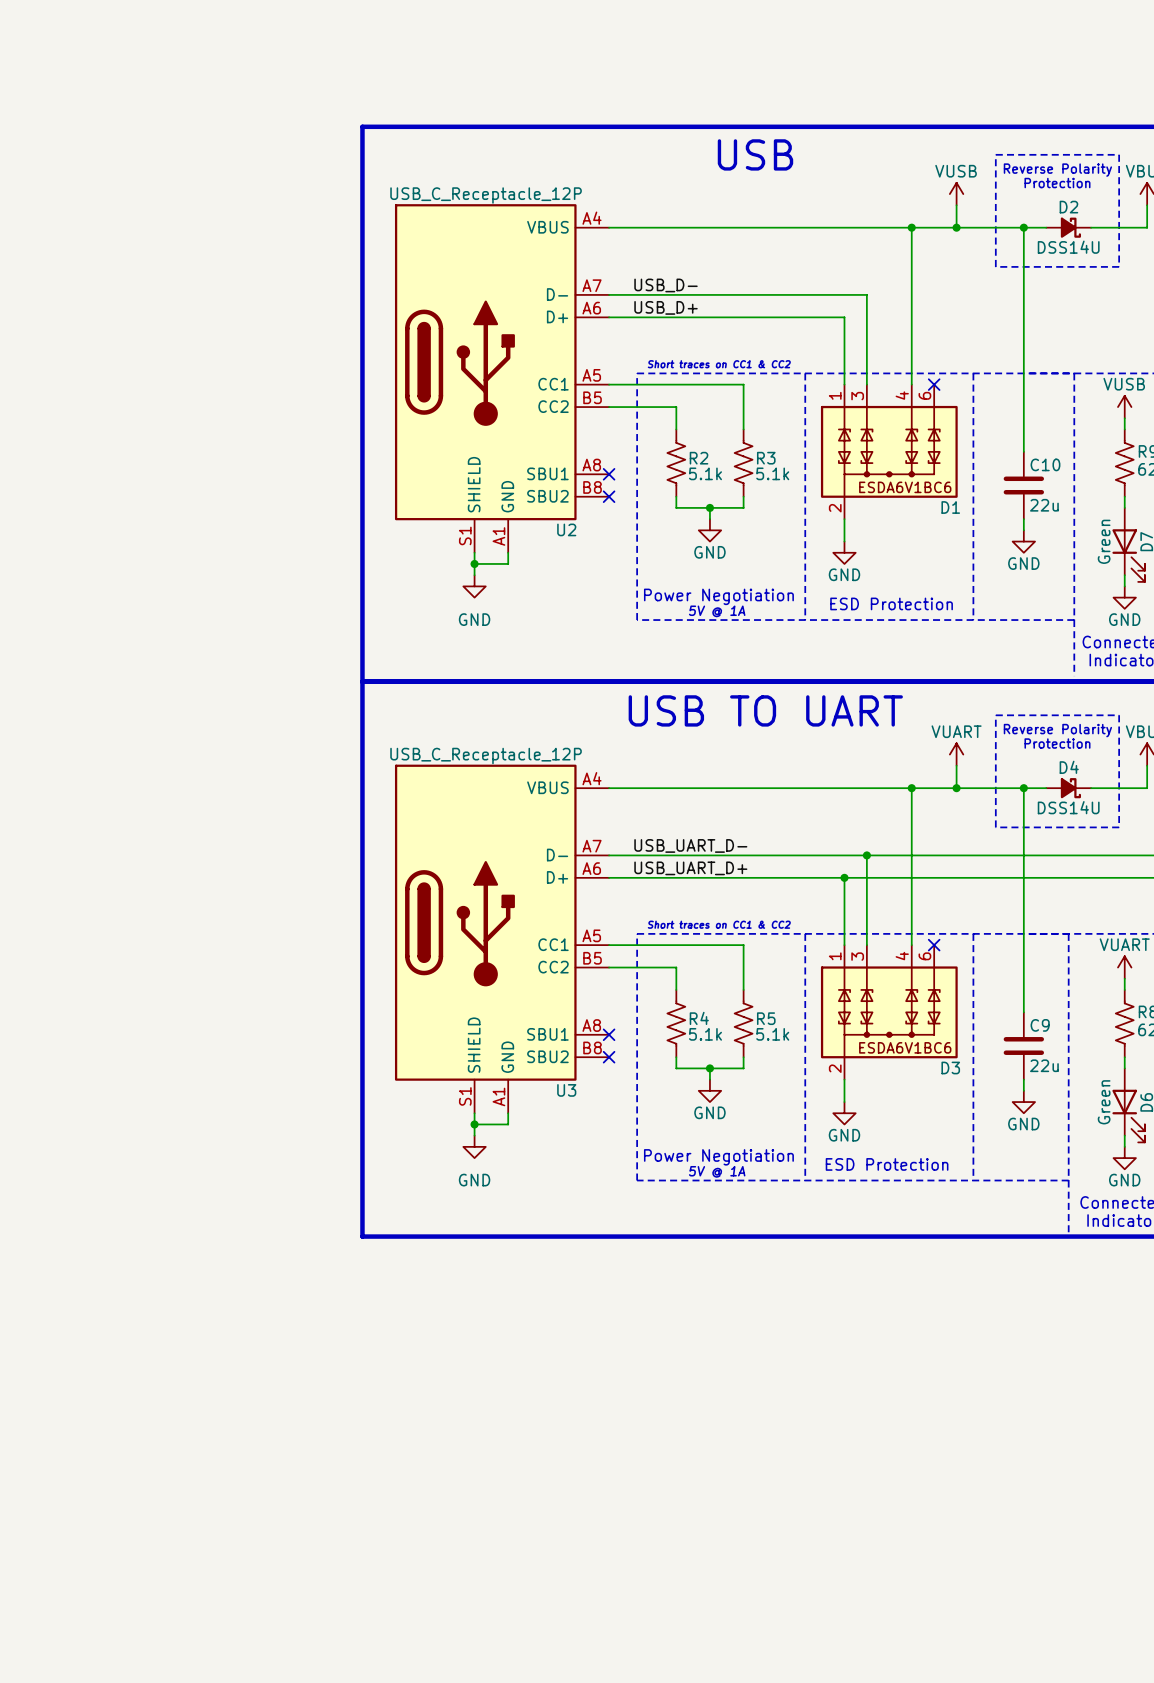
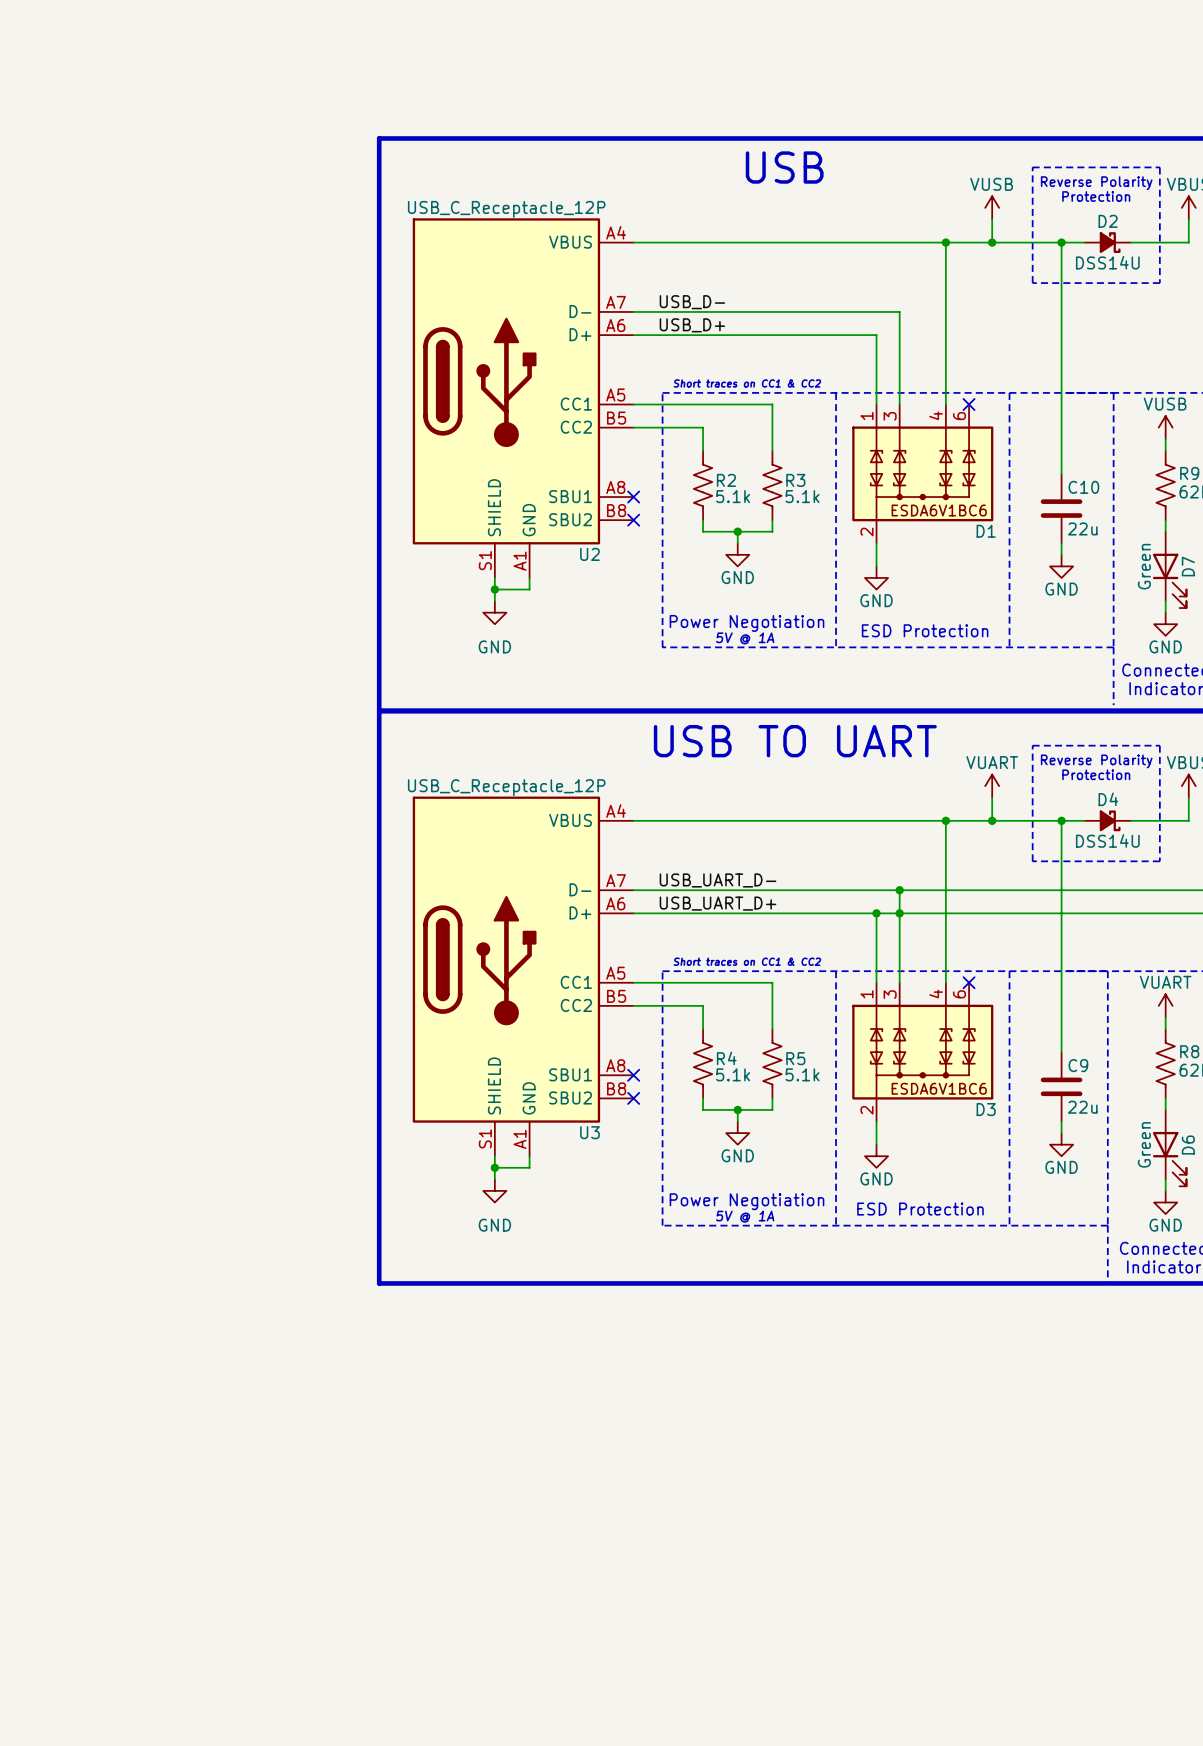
junction: none -> (899, 913)

